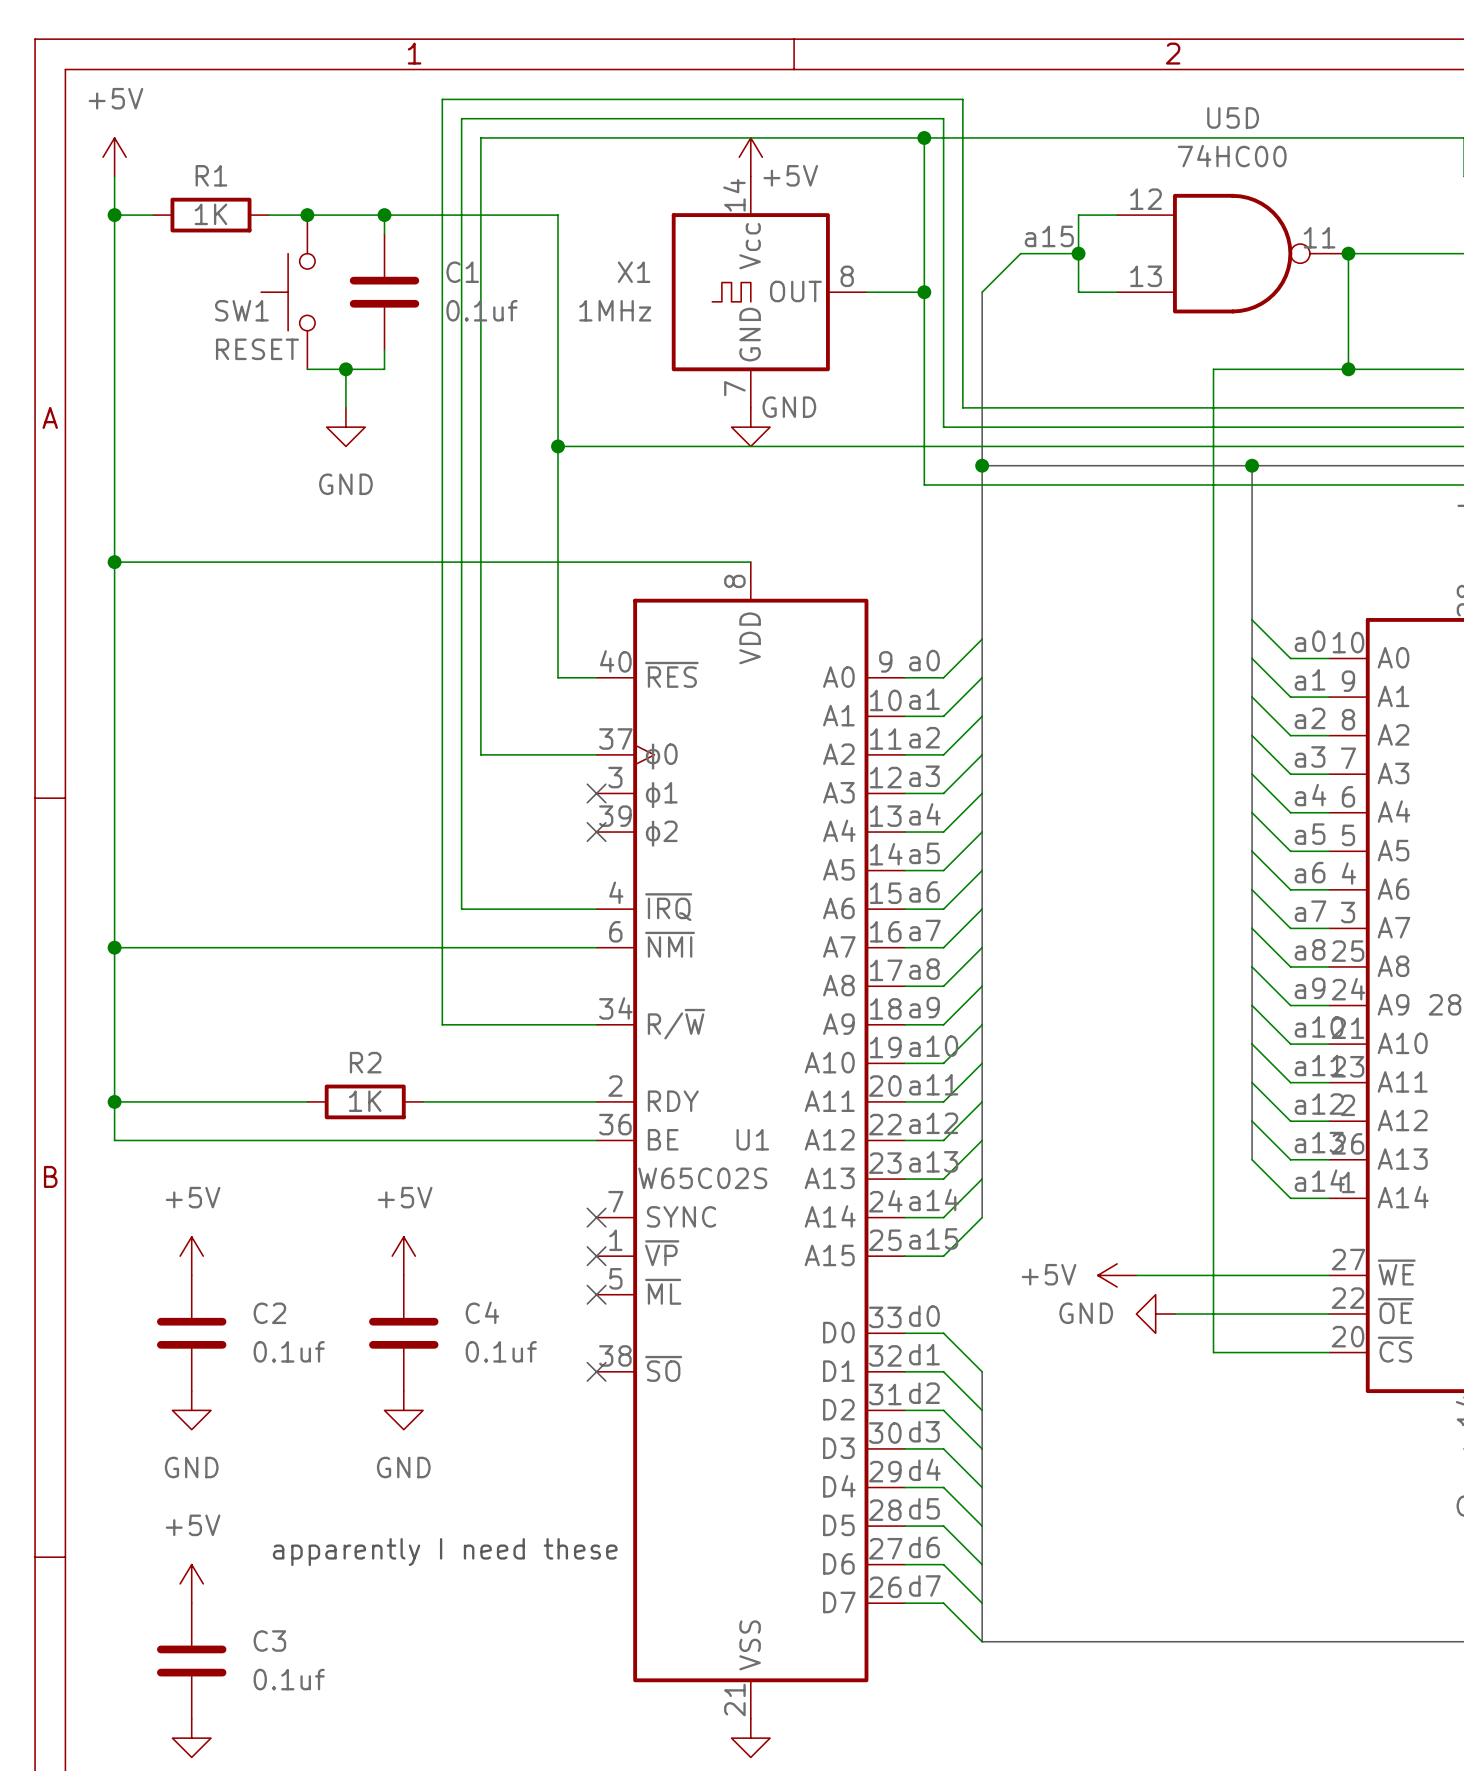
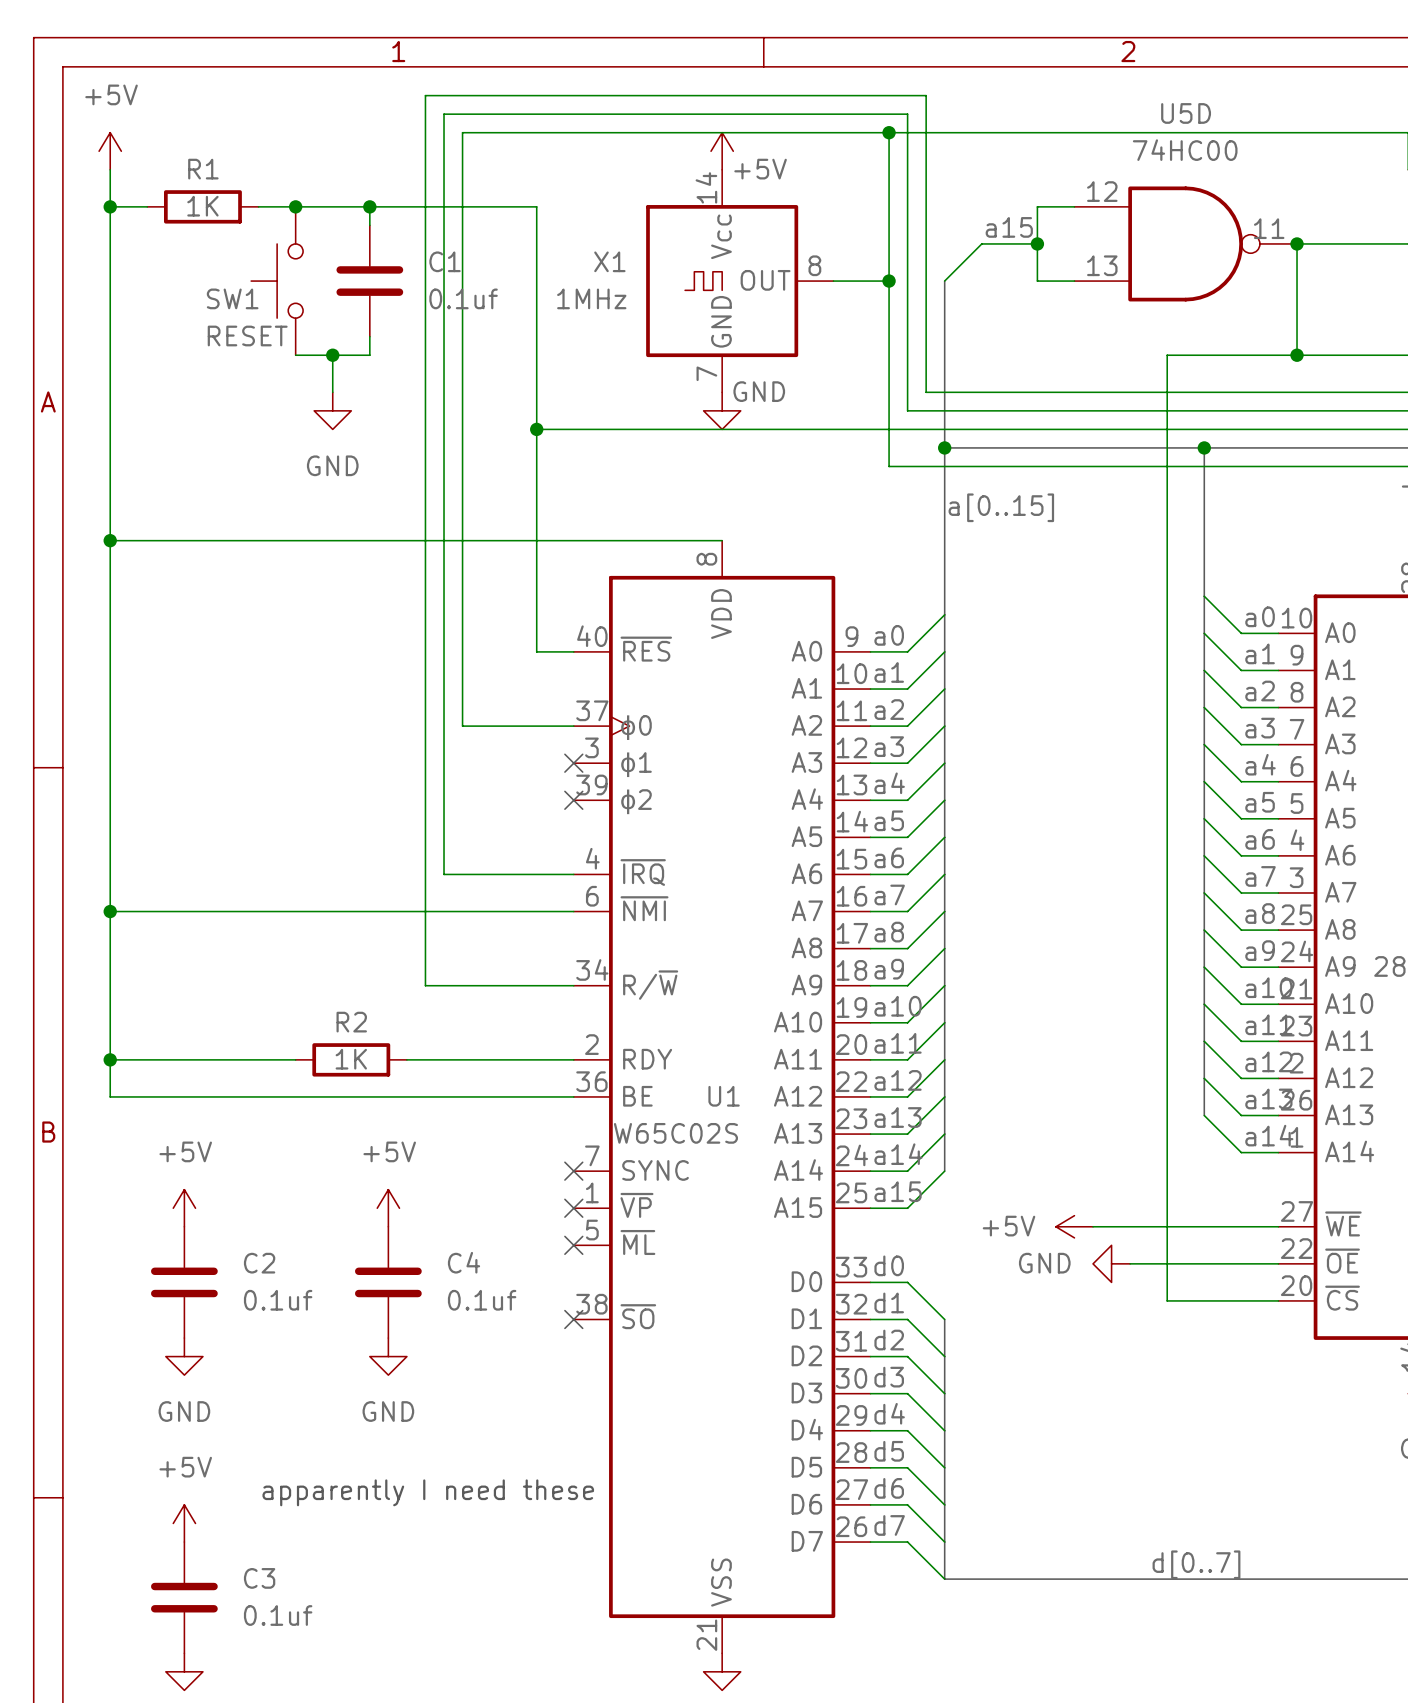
label: none -> a[0..15] (1001, 507)
label: none -> d[0..7] (1196, 1564)

